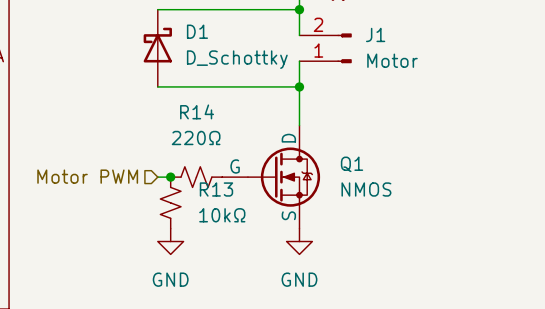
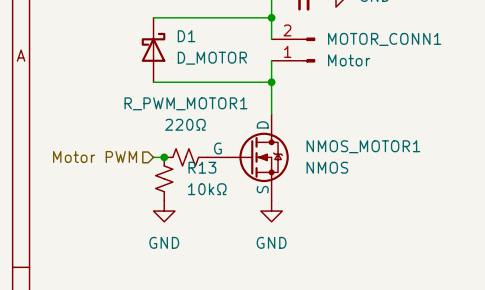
J1 name: J1 (375, 34) -> MOTOR_CONN1 (384, 39)
D1 value: D_Schottky (237, 59) -> D_MOTOR (212, 58)
R14 name: R14 (197, 111) -> R_PWM_MOTOR1 (185, 103)
Q1 name: Q1 (352, 164) -> NMOS_MOTOR1 (363, 146)

